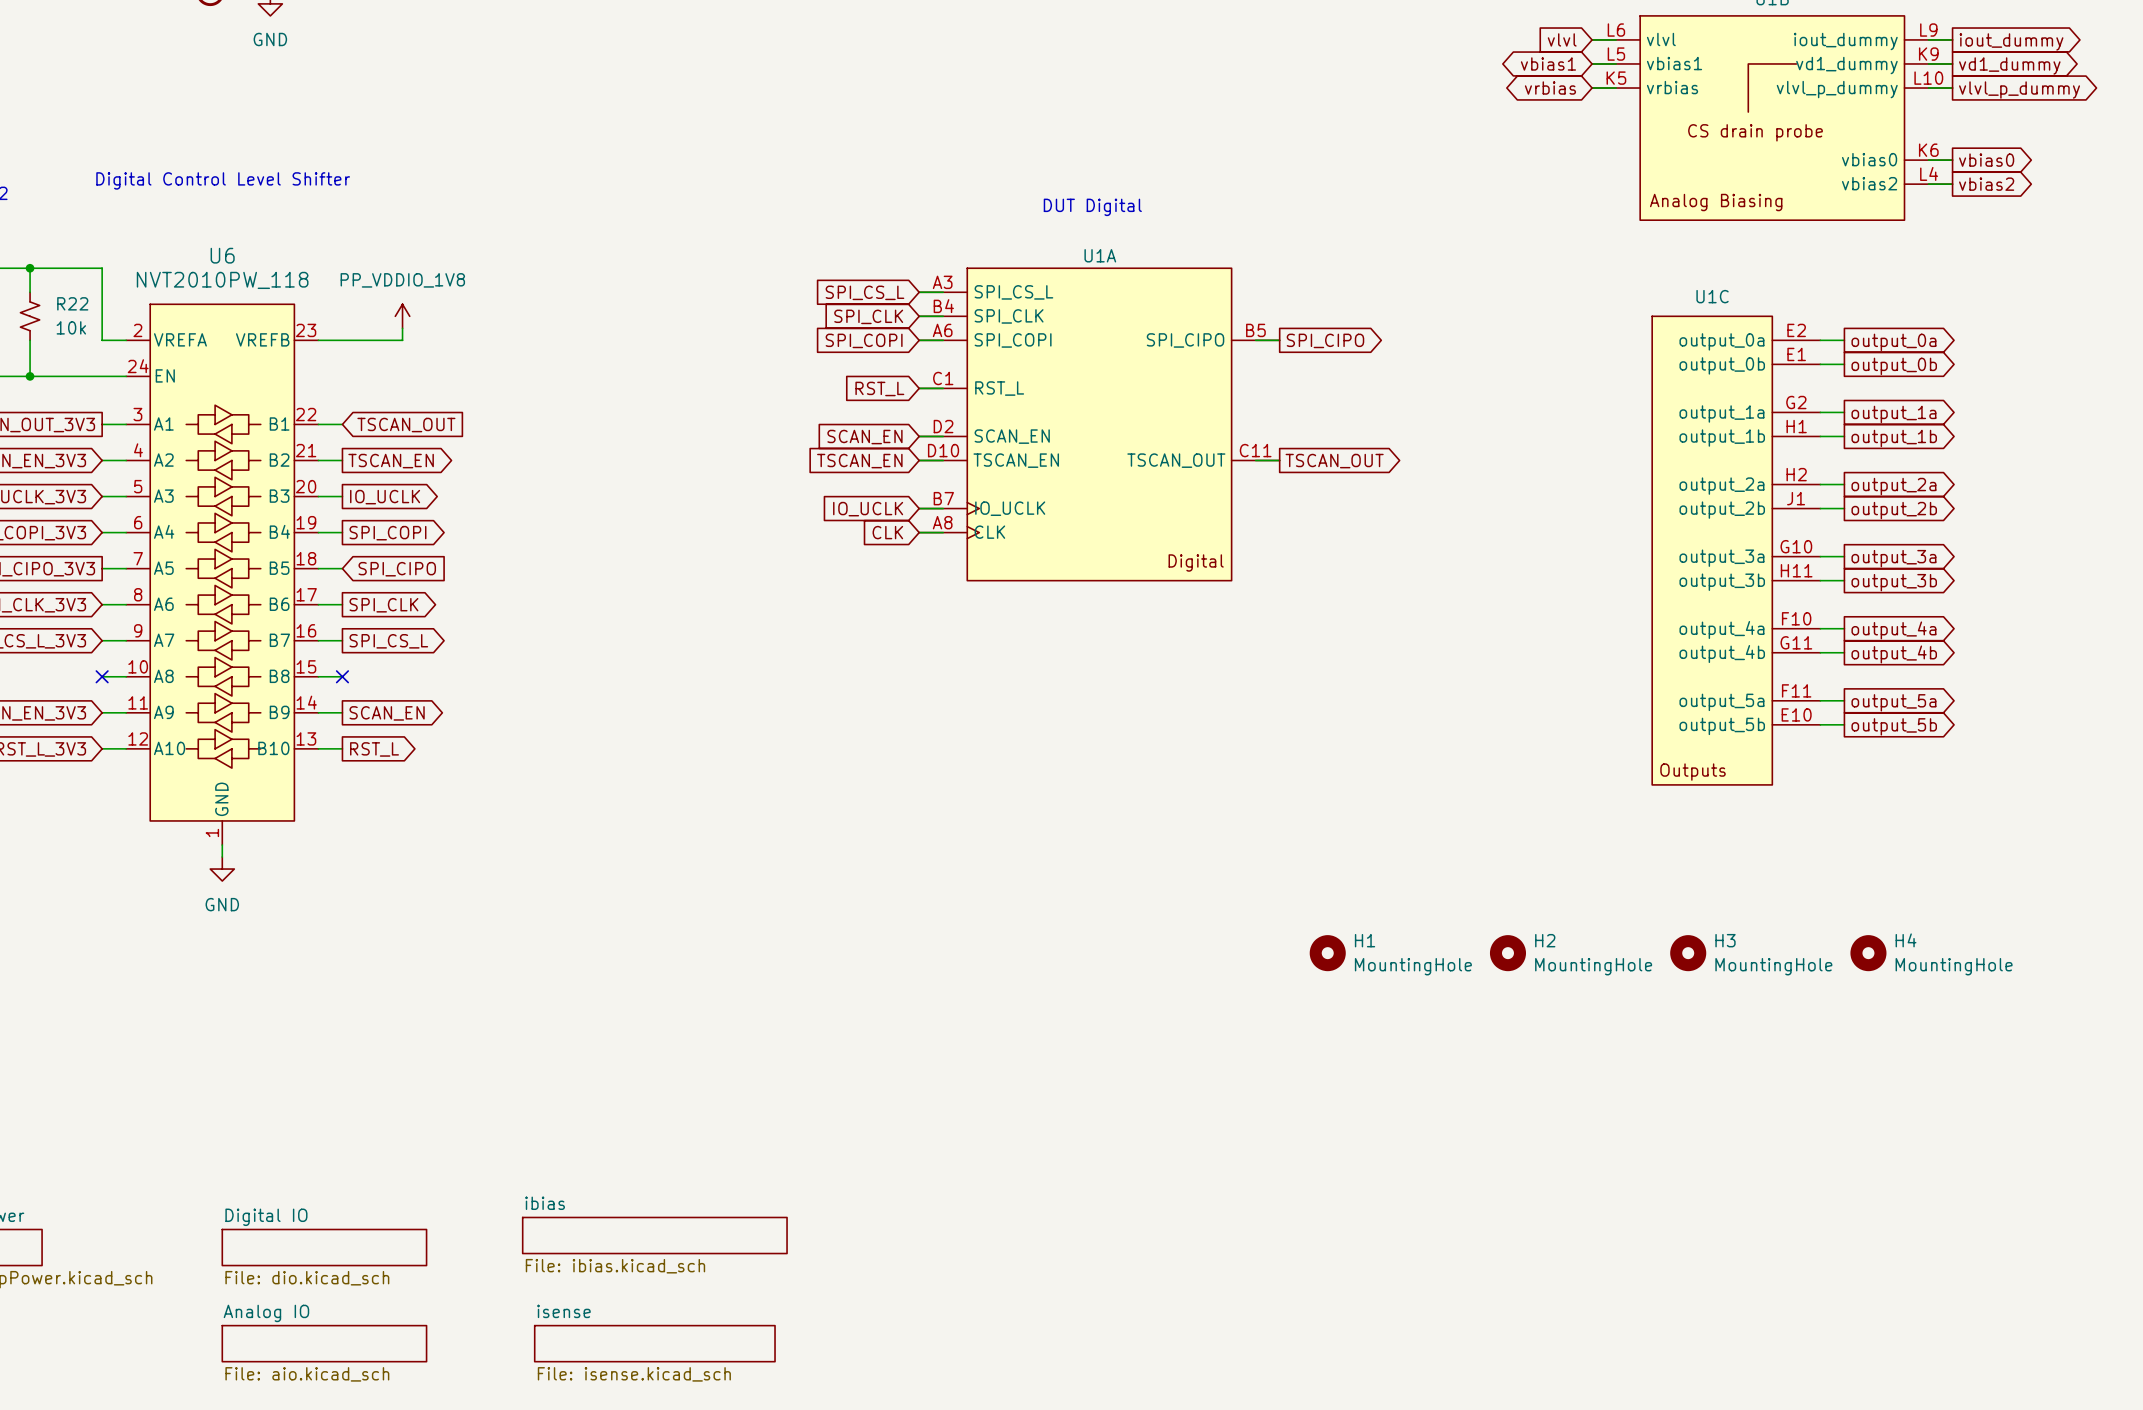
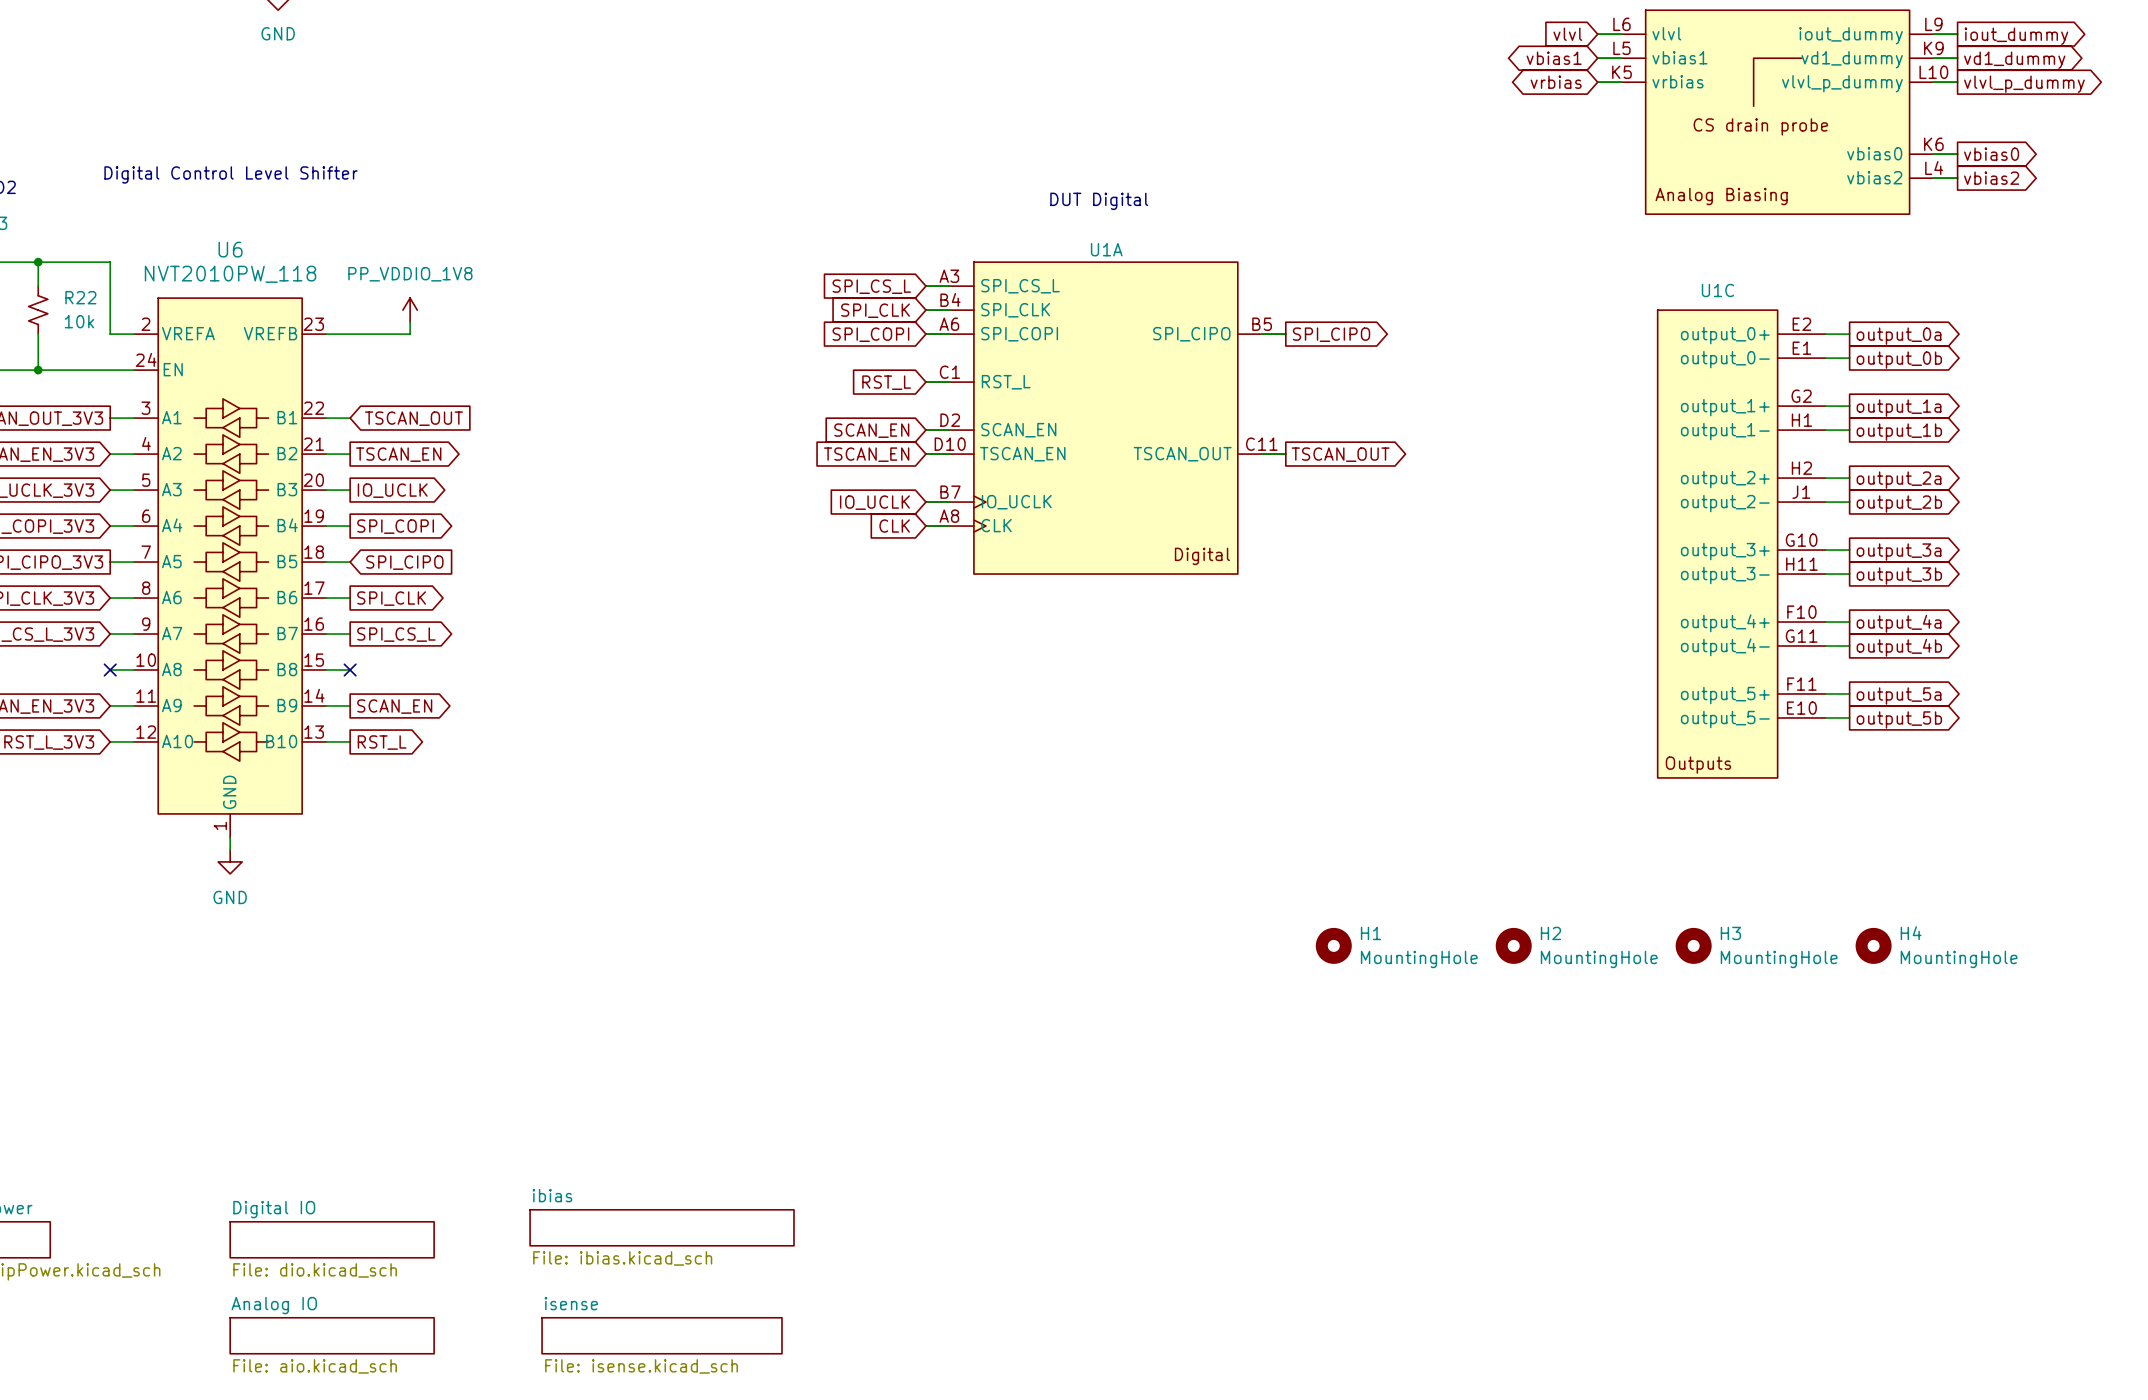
U1C symbol: [1652, 316, 1821, 785] -> [1657, 310, 1826, 778]

